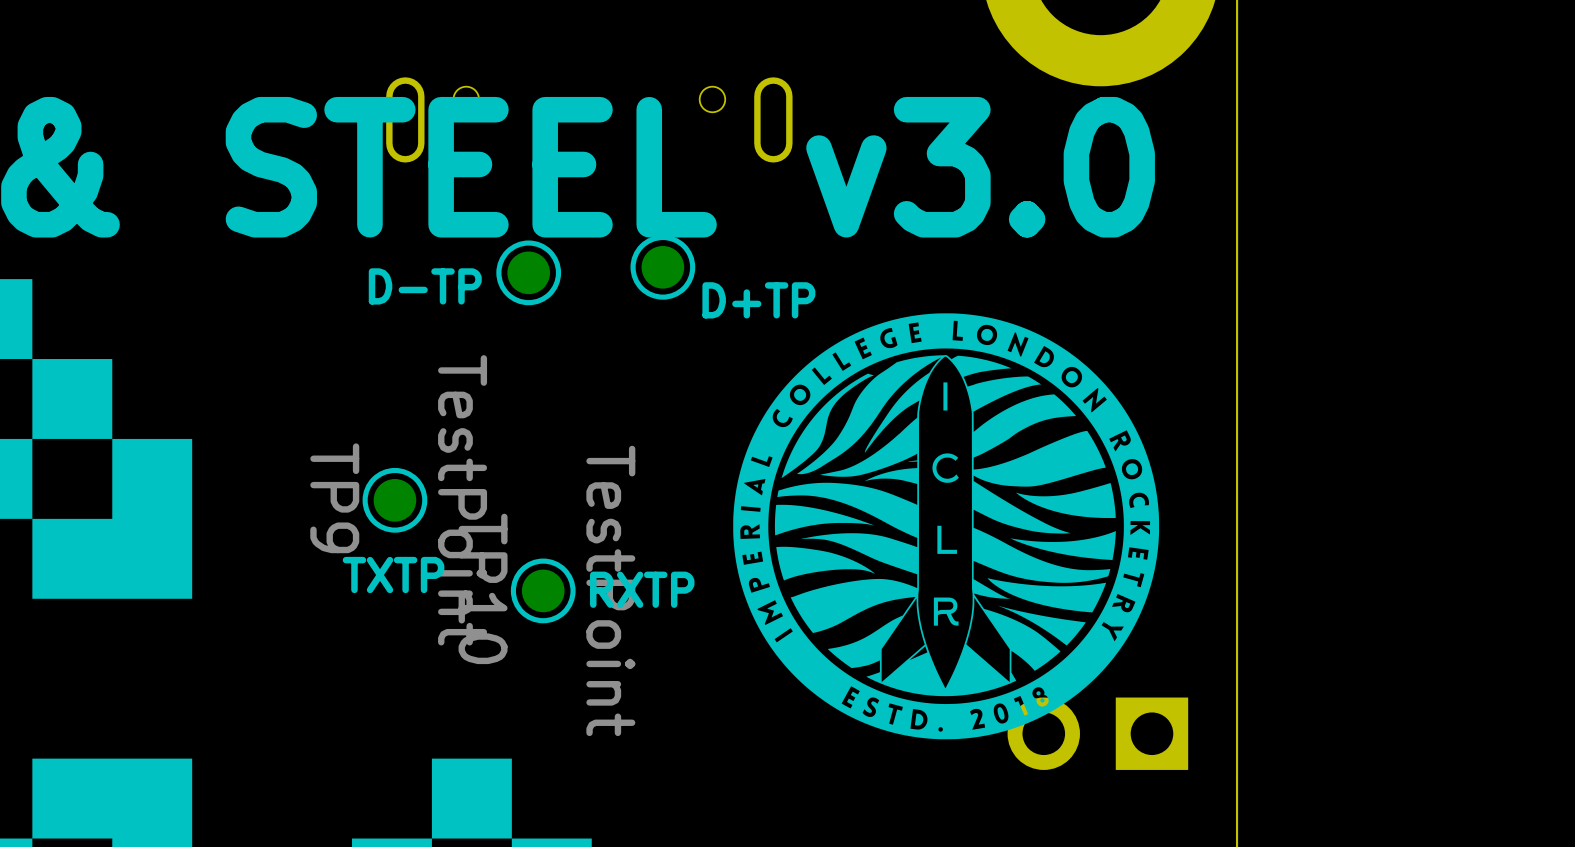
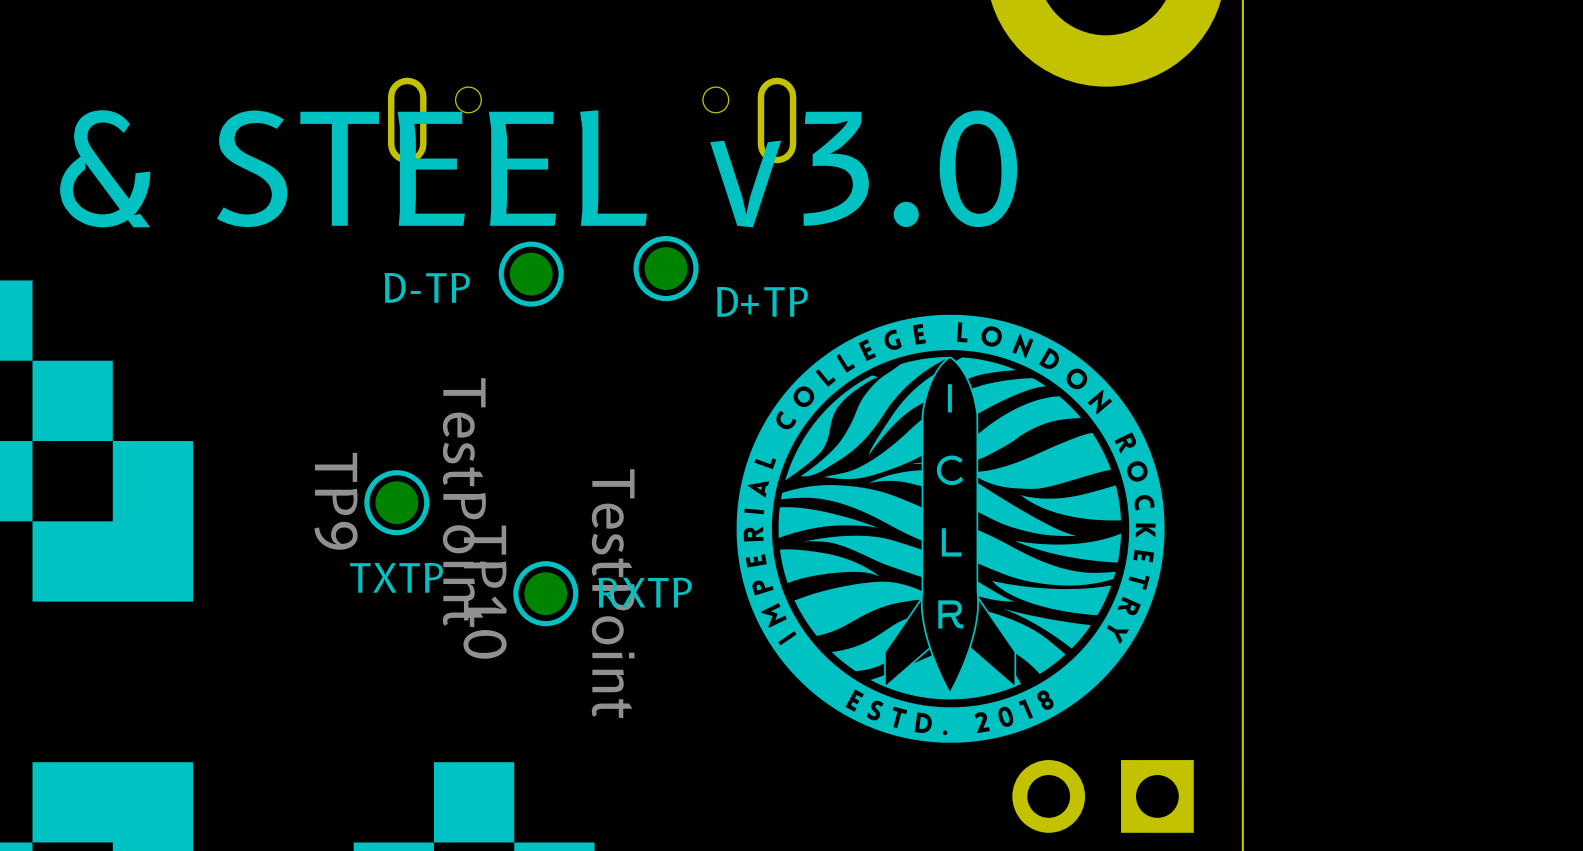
part: (1097, 733) -> none
part: none -> (1103, 796)

